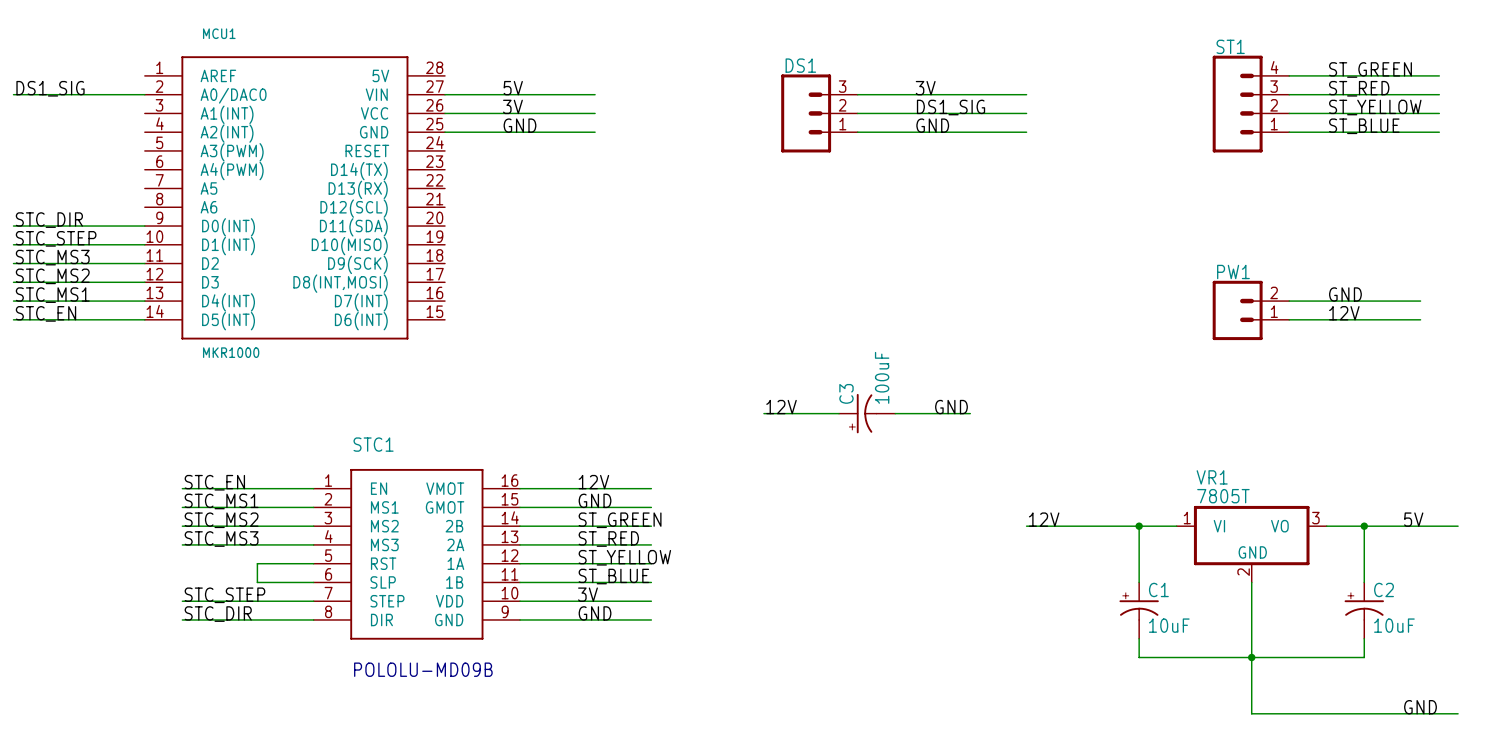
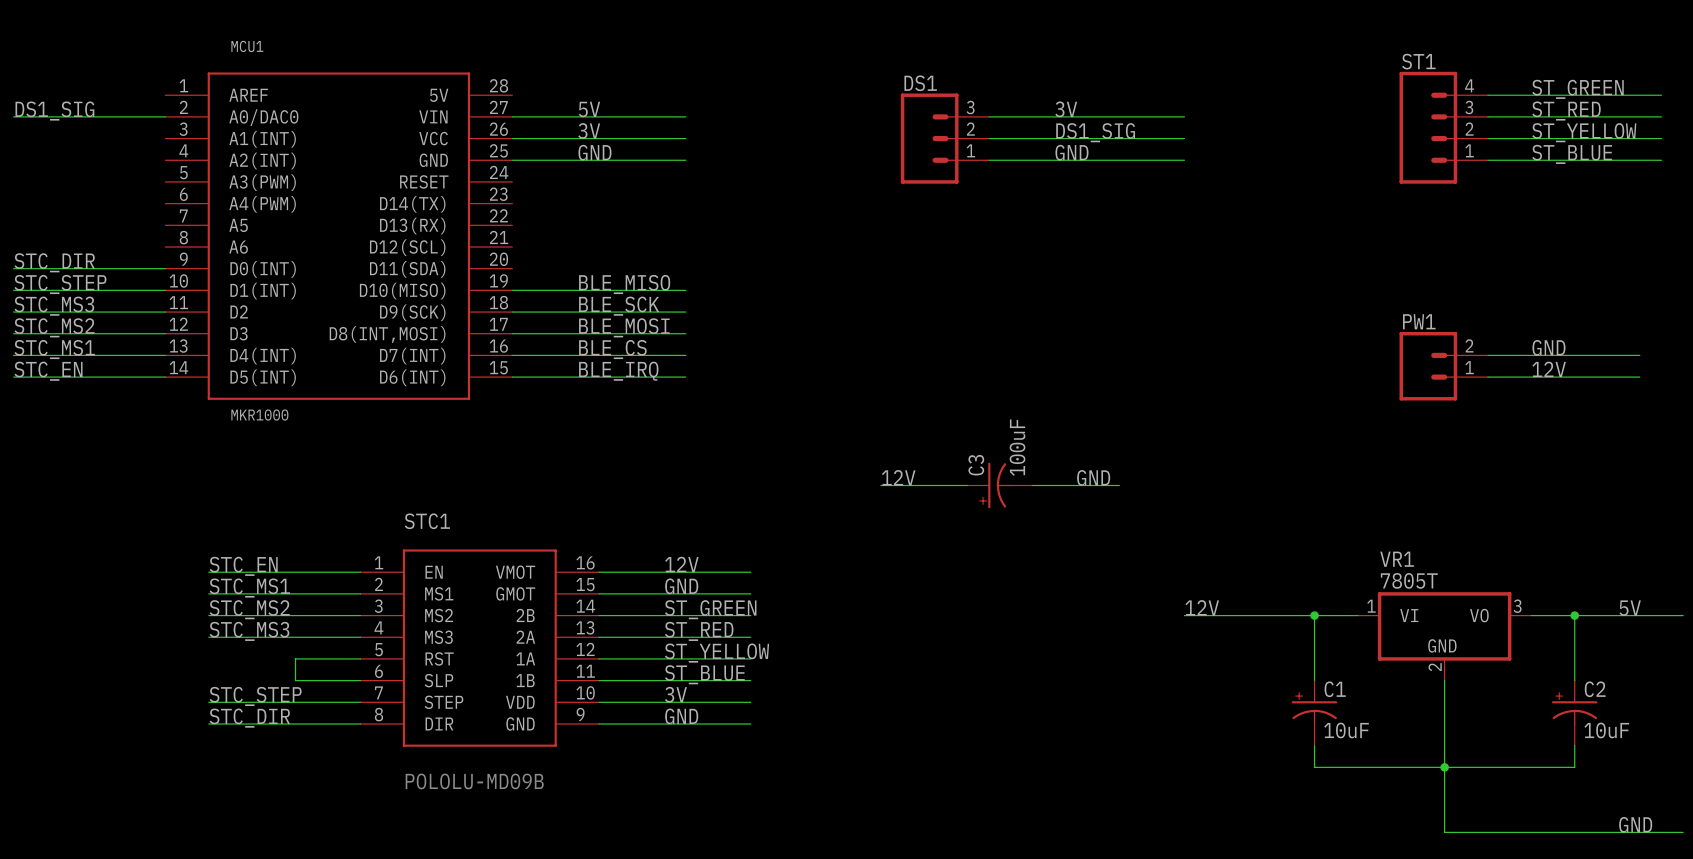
label: none -> BLE_MISO (624, 284)
wire: none -> (512, 290) (685, 290)
label: none -> BLE_SCK (619, 306)
wire: none -> (512, 312) (685, 312)
label: none -> BLE_MOSI (624, 327)
wire: none -> (512, 333) (685, 333)
label: none -> BLE_CS (612, 349)
wire: none -> (512, 355) (685, 355)
label: none -> BLE_IRQ (618, 371)
wire: none -> (512, 377) (685, 377)

